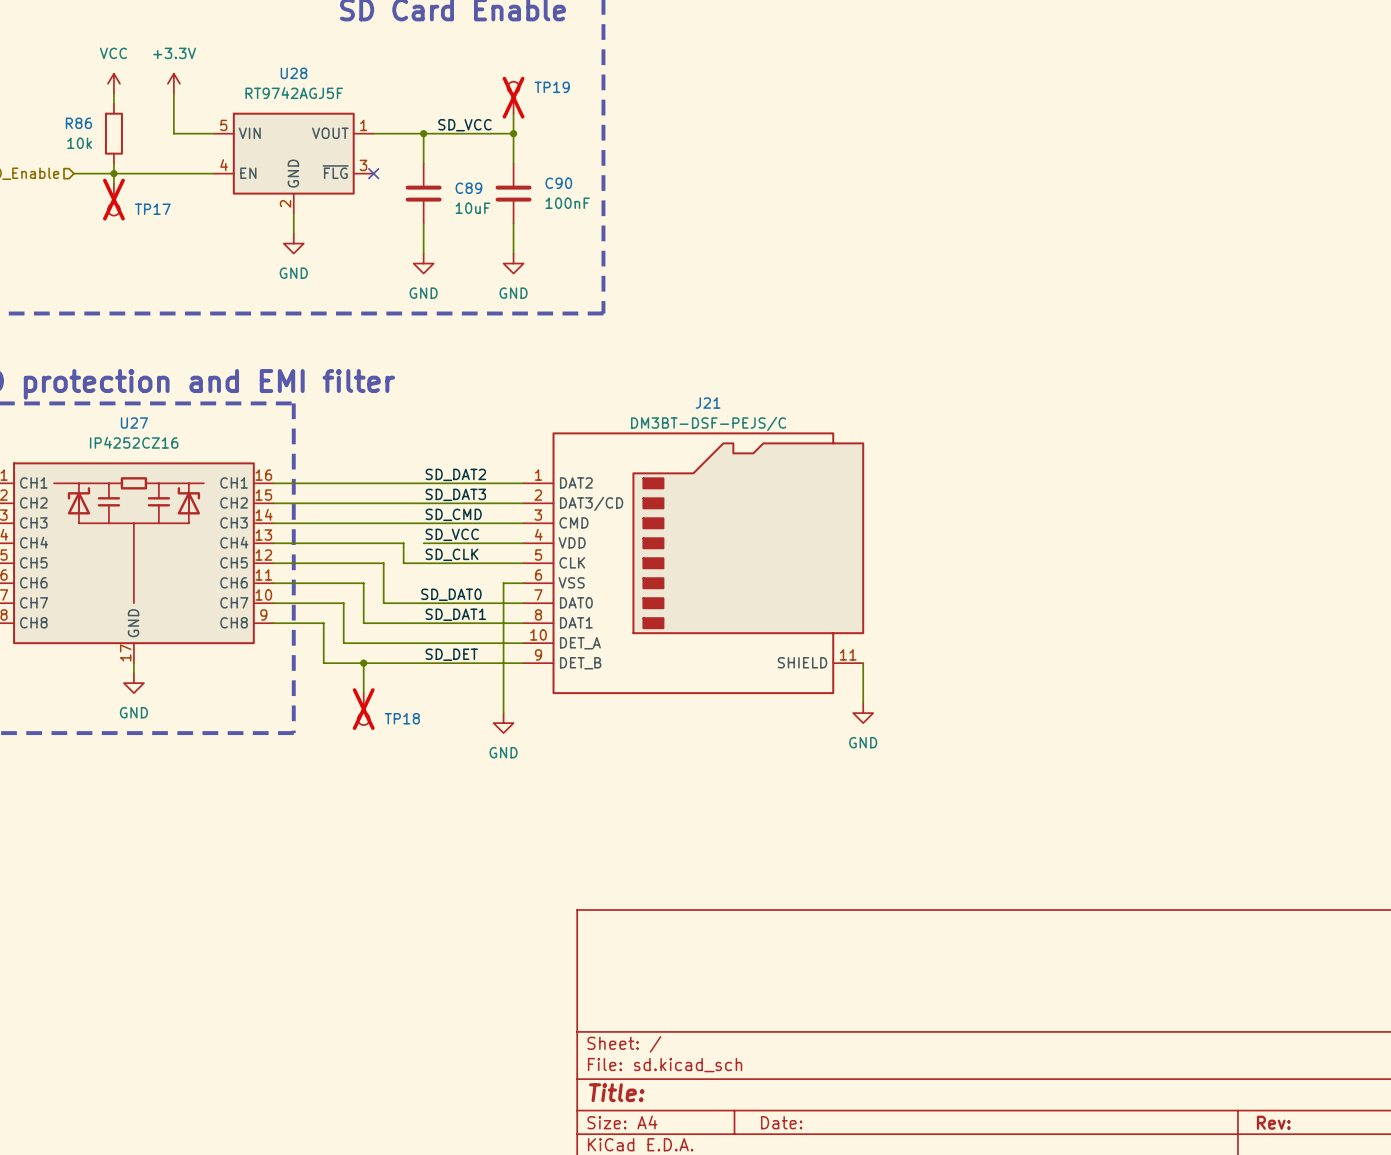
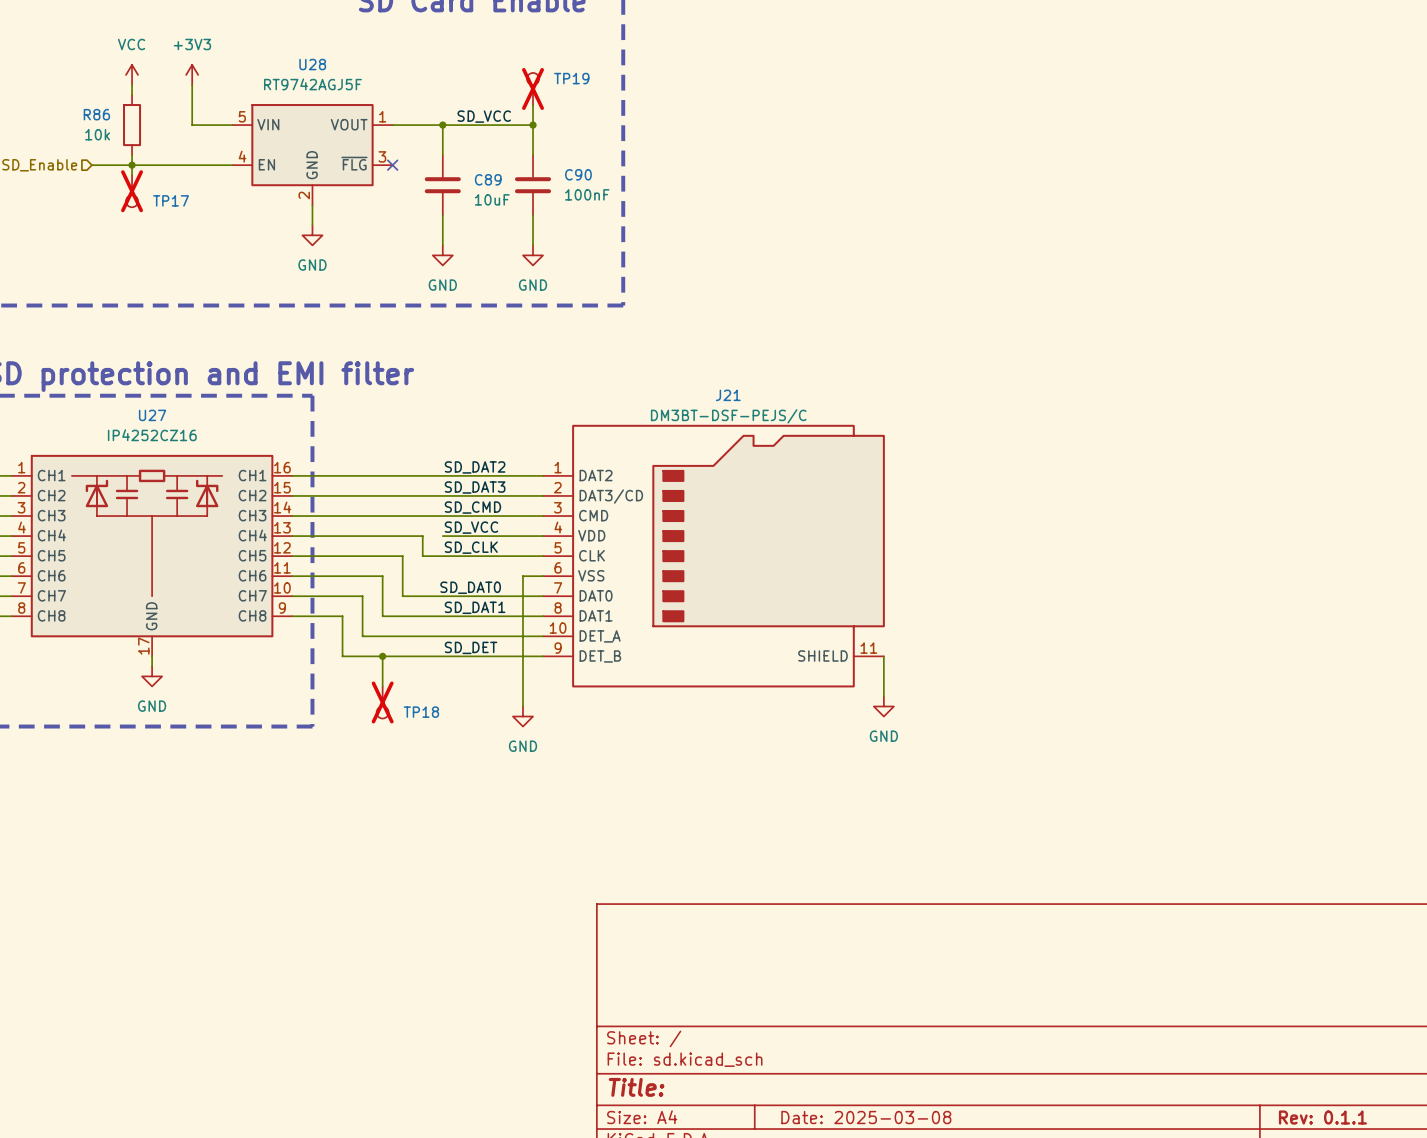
power symbol: +3.3V (173, 83) -> +3V3 (192, 74)
title block: Date: (781, 1122) -> Date: 2025-03-08 (866, 1117)
title block: Rev: (1273, 1122) -> Rev: 0.1.1 (1322, 1117)

